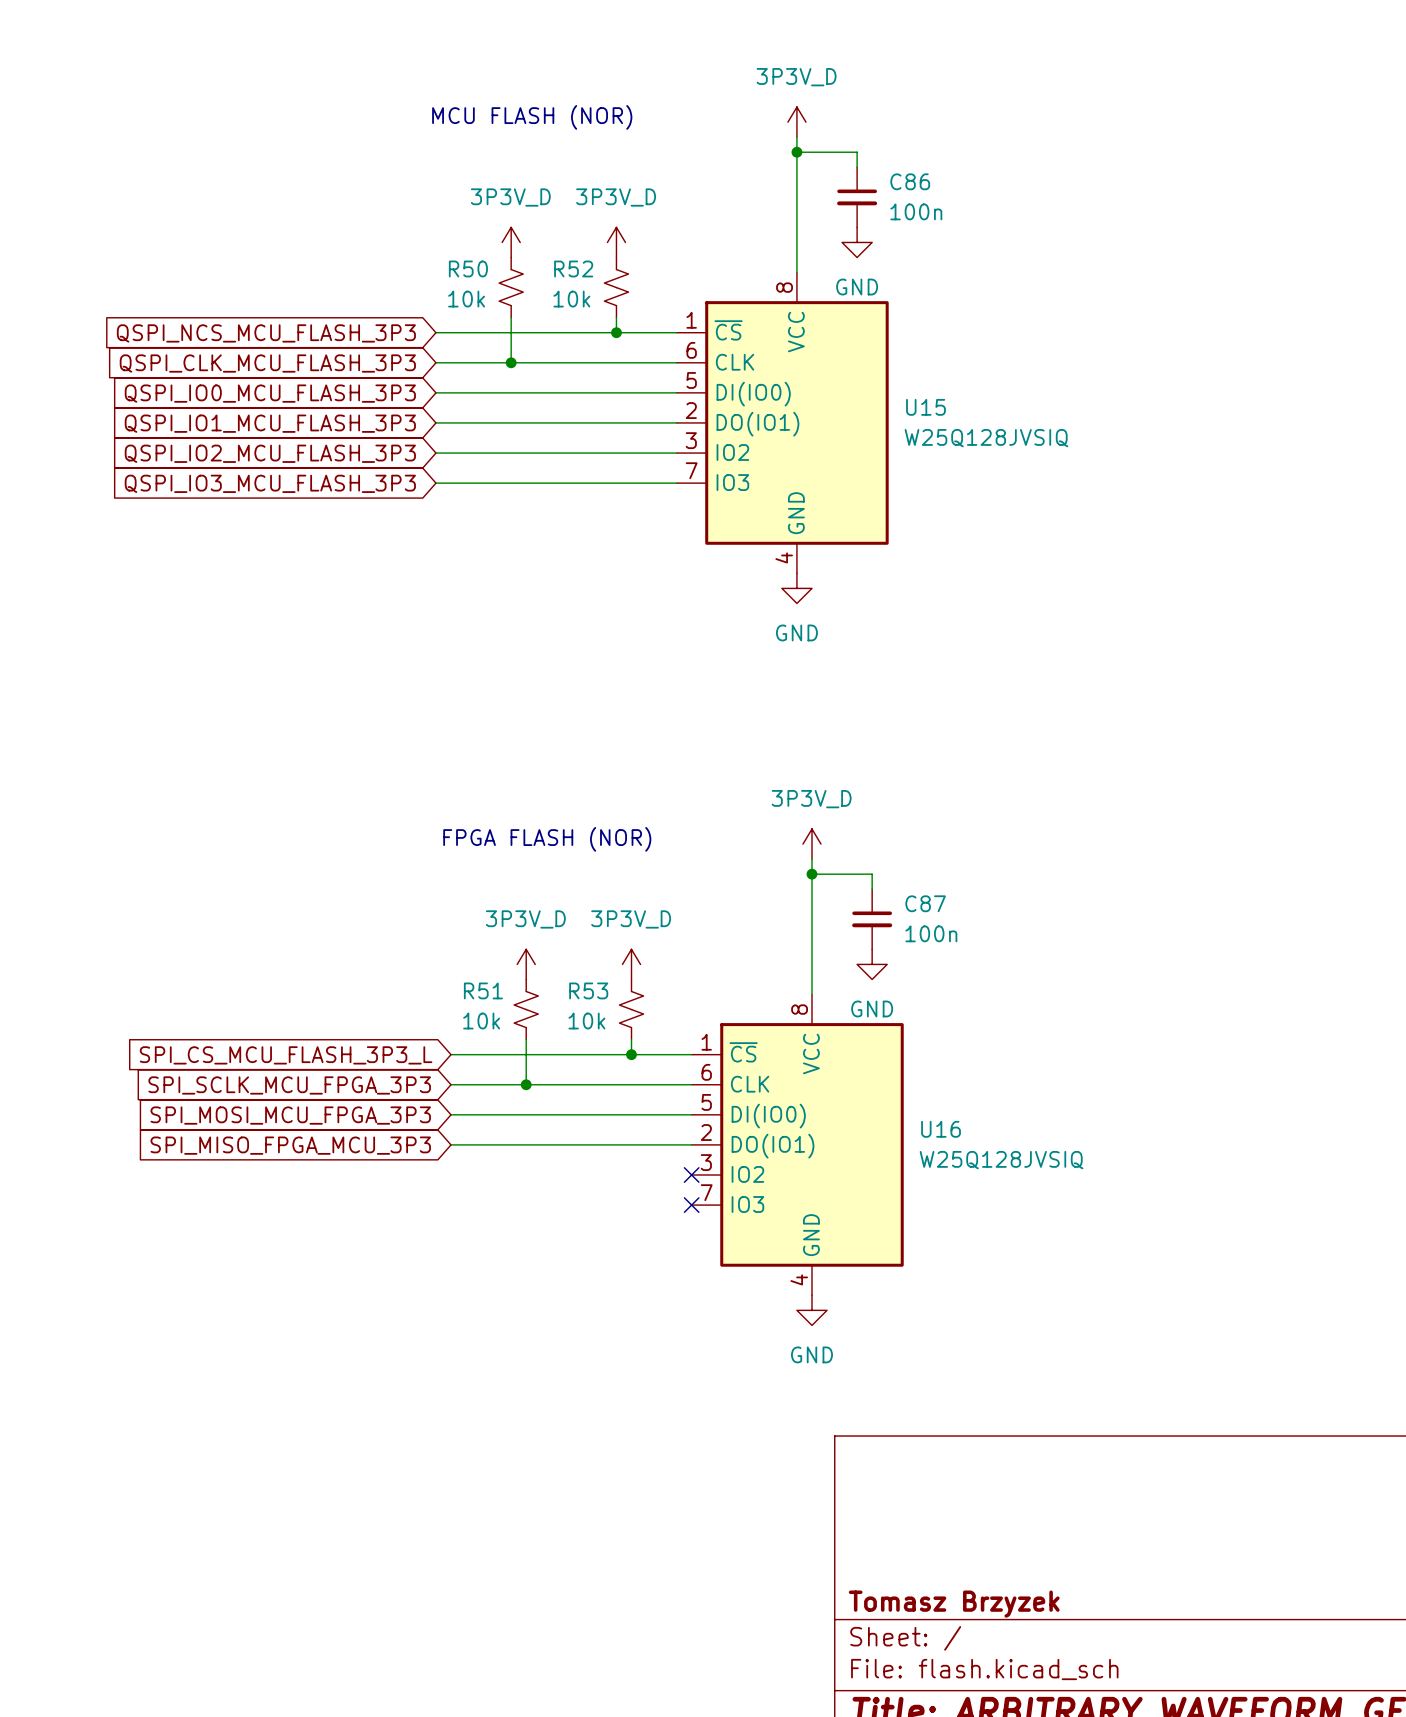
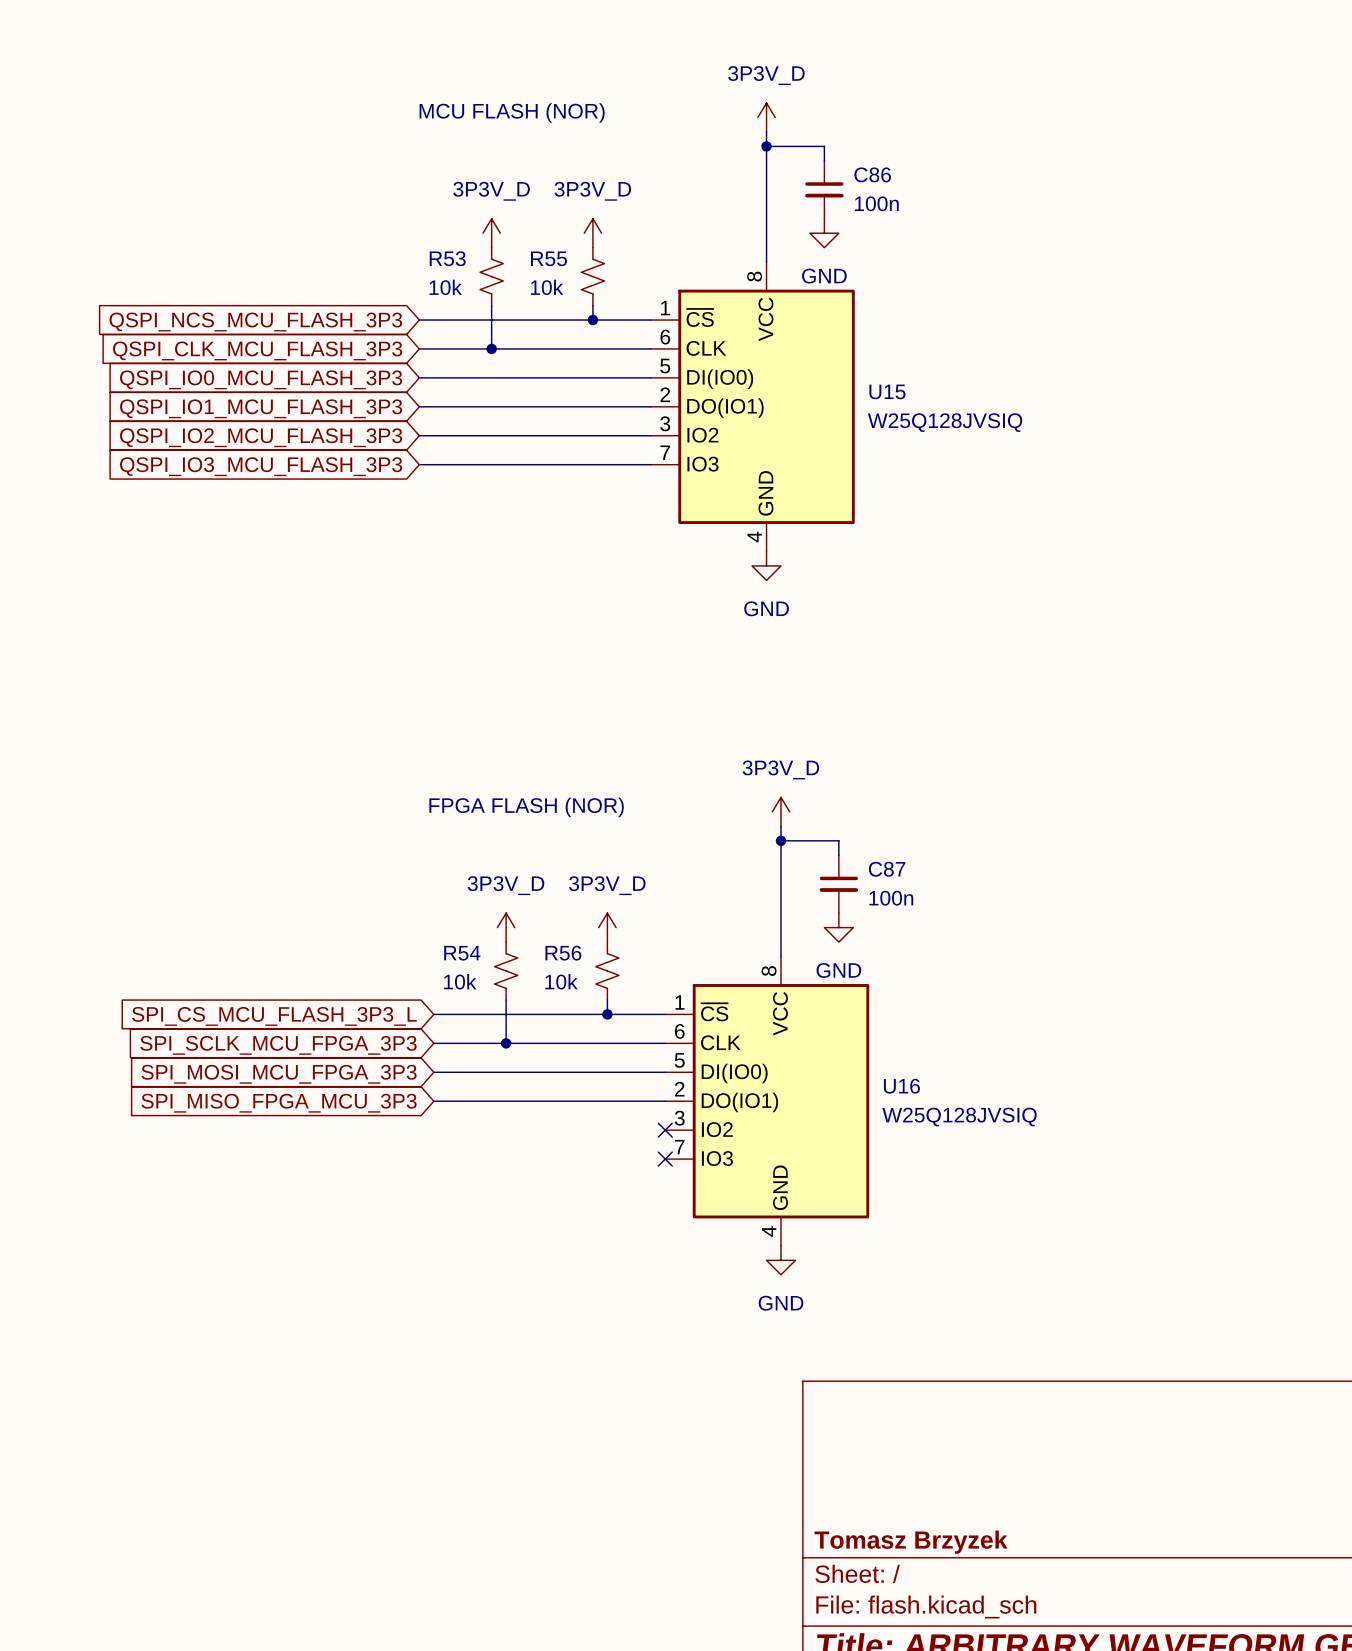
R50 name: R50 (468, 268) -> R53 (447, 258)
R52 name: R52 (573, 268) -> R55 (548, 258)
R51 name: R51 (483, 990) -> R54 (462, 953)
R53 name: R53 (588, 990) -> R56 (563, 953)

